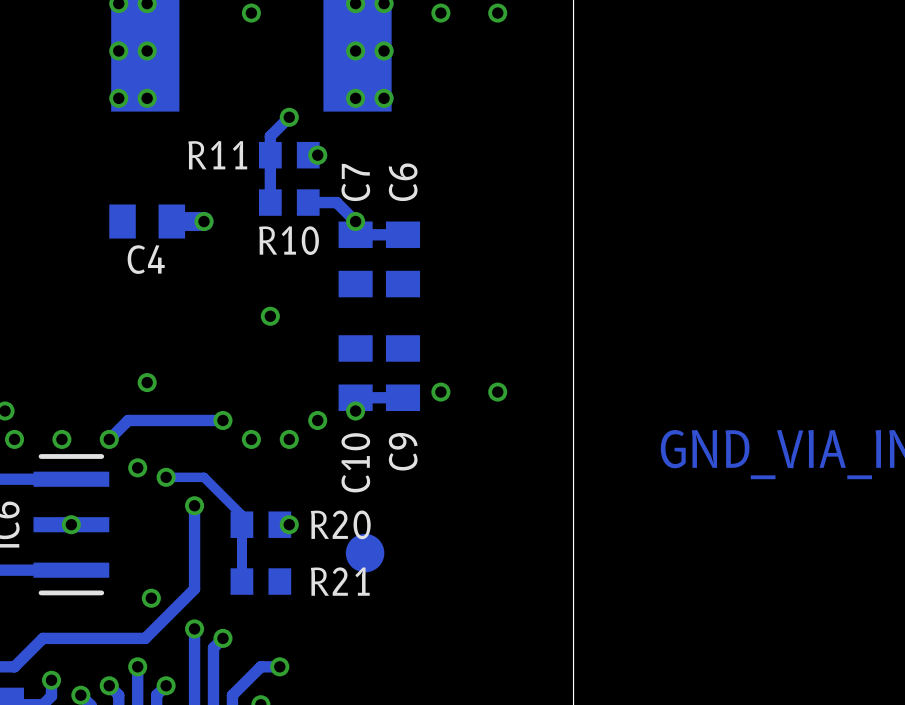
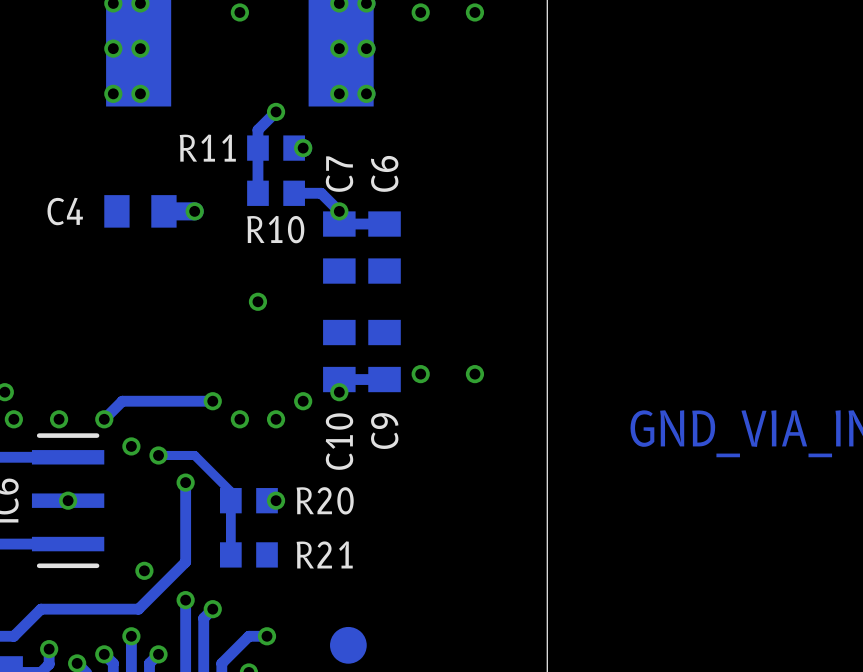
C4 name position: C4 (146, 259) -> C4 (65, 211)
via: (147, 382) -> none
part position: (365, 553) -> (348, 645)

